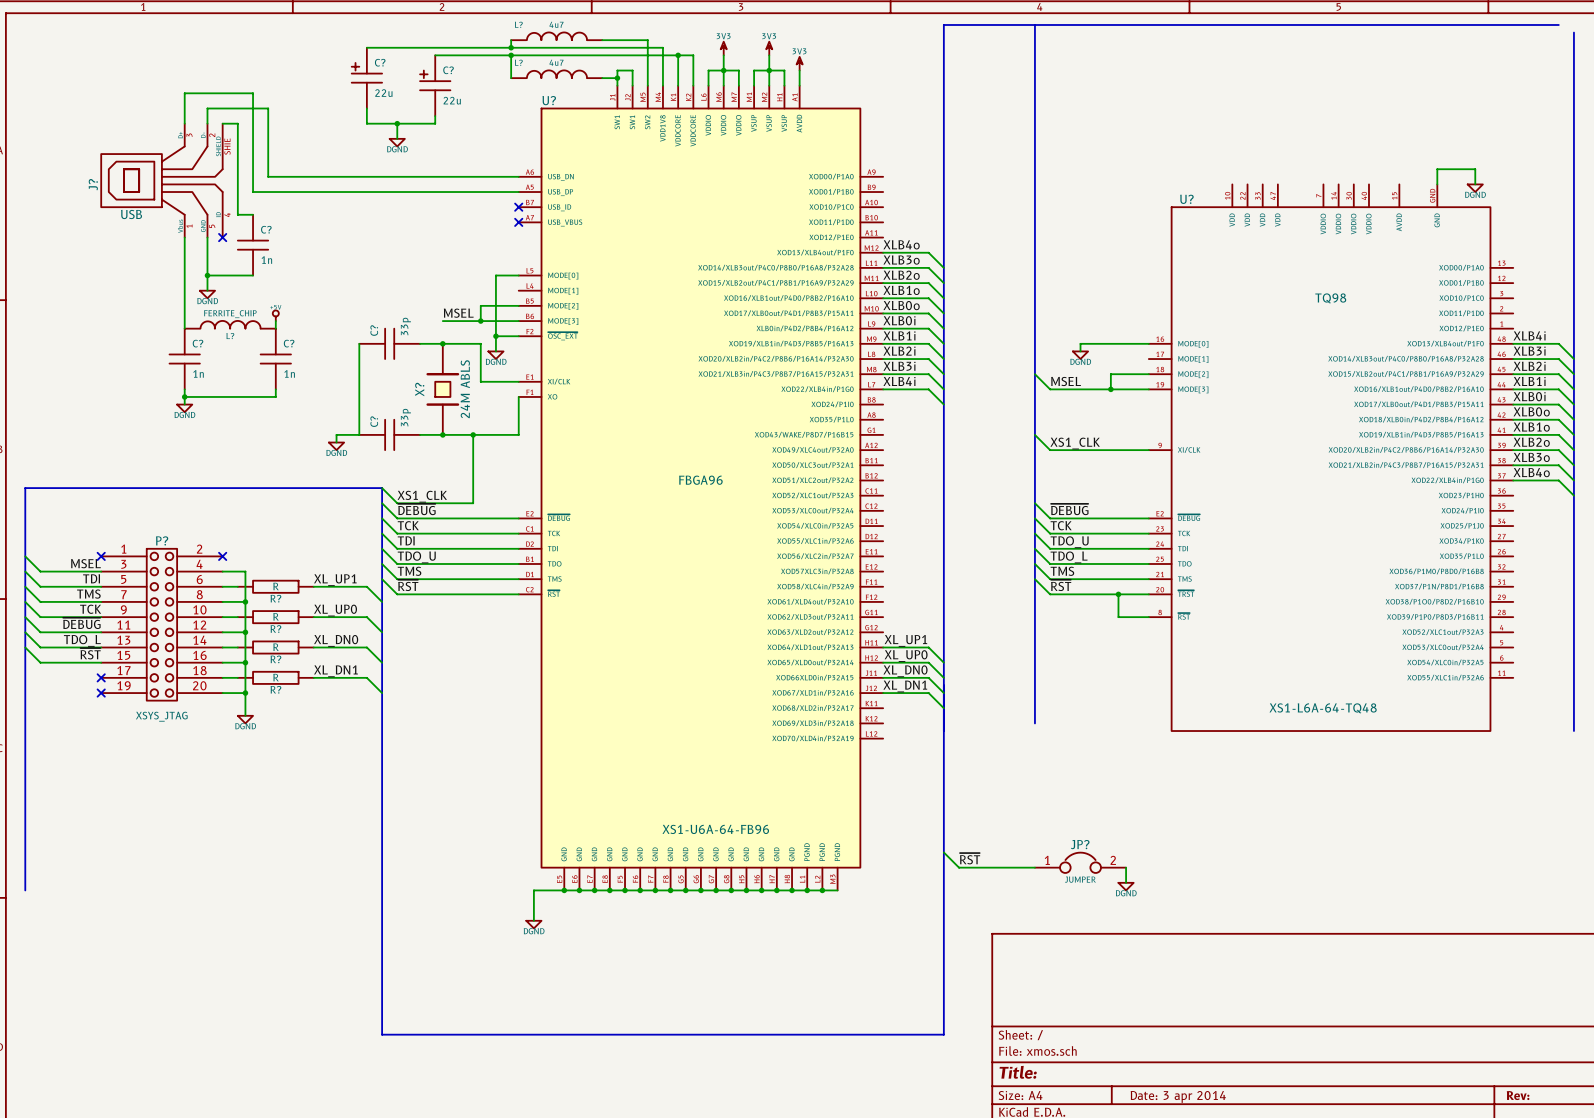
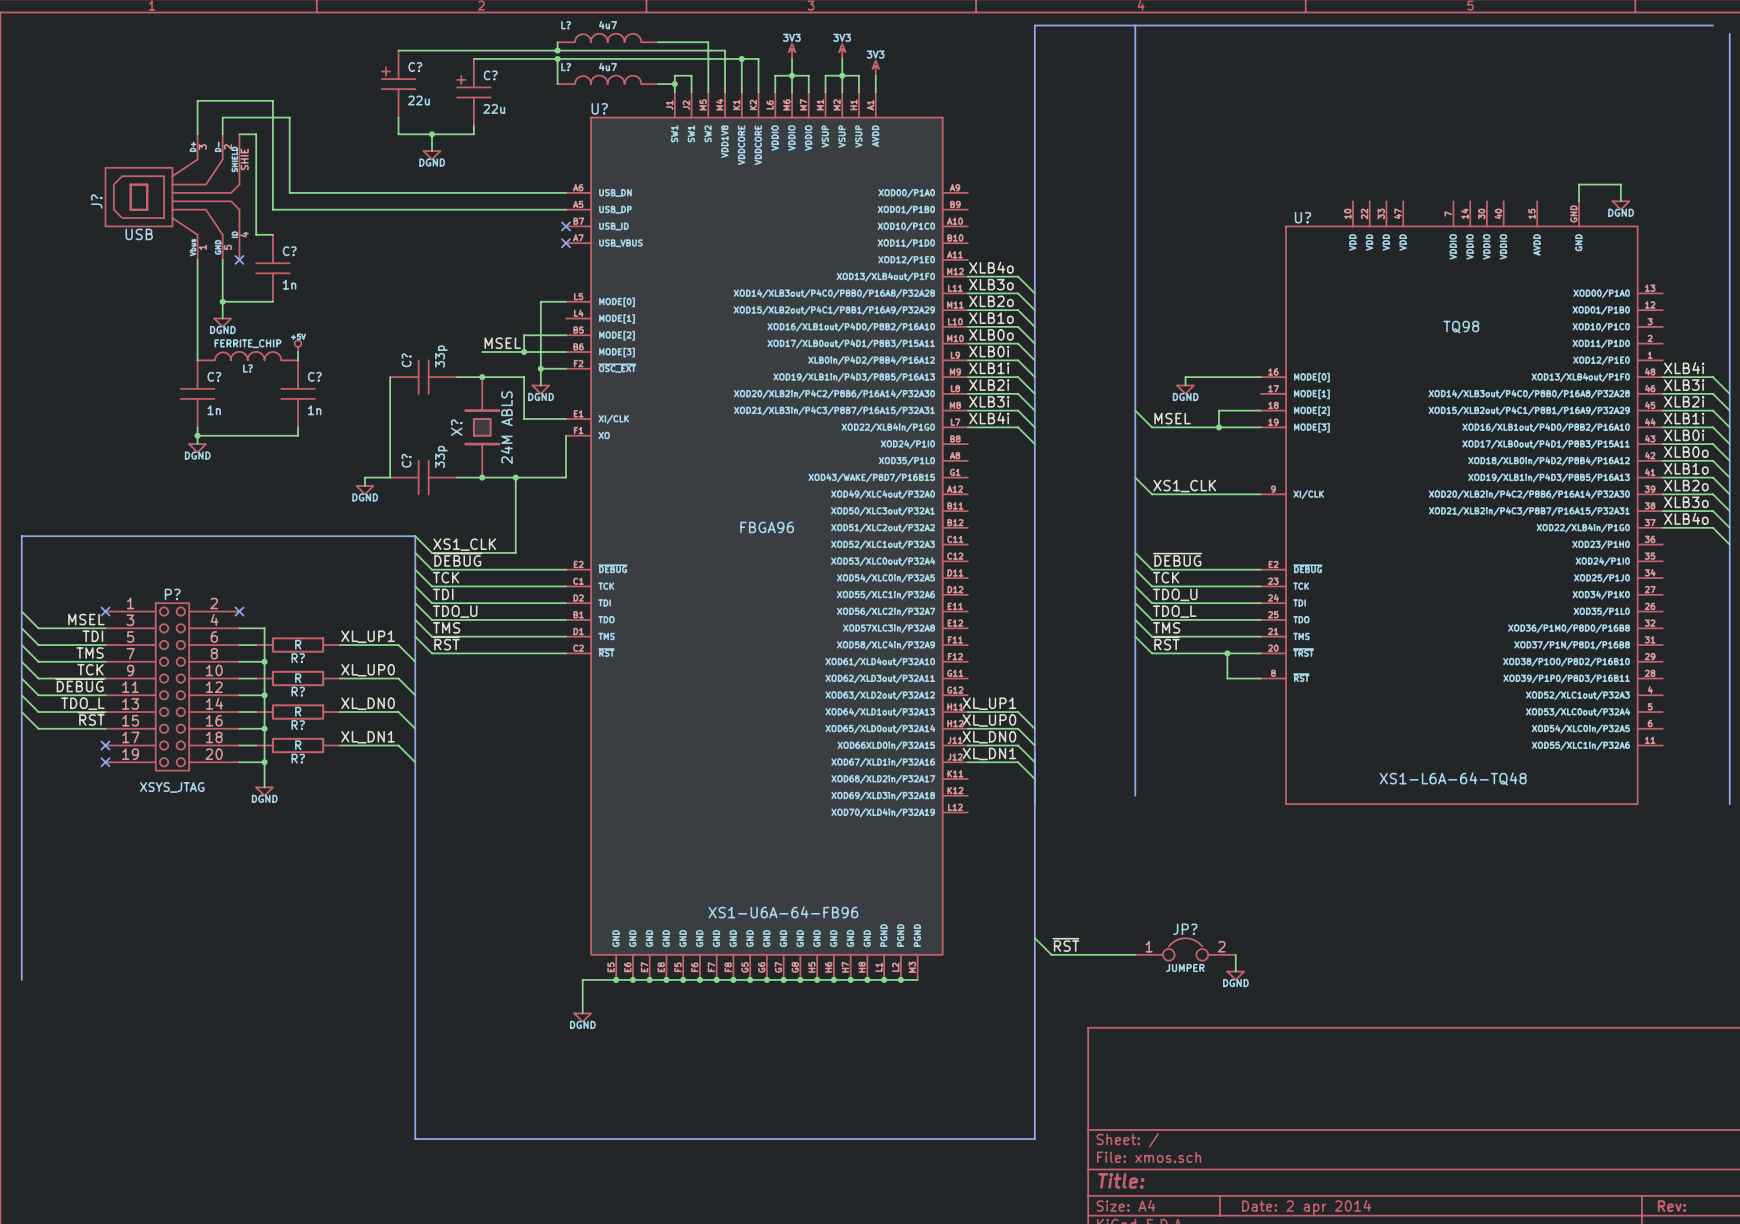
title block: Date: 3 apr 2014 (1178, 1096) -> Date: 2 apr 2014 (1306, 1207)

